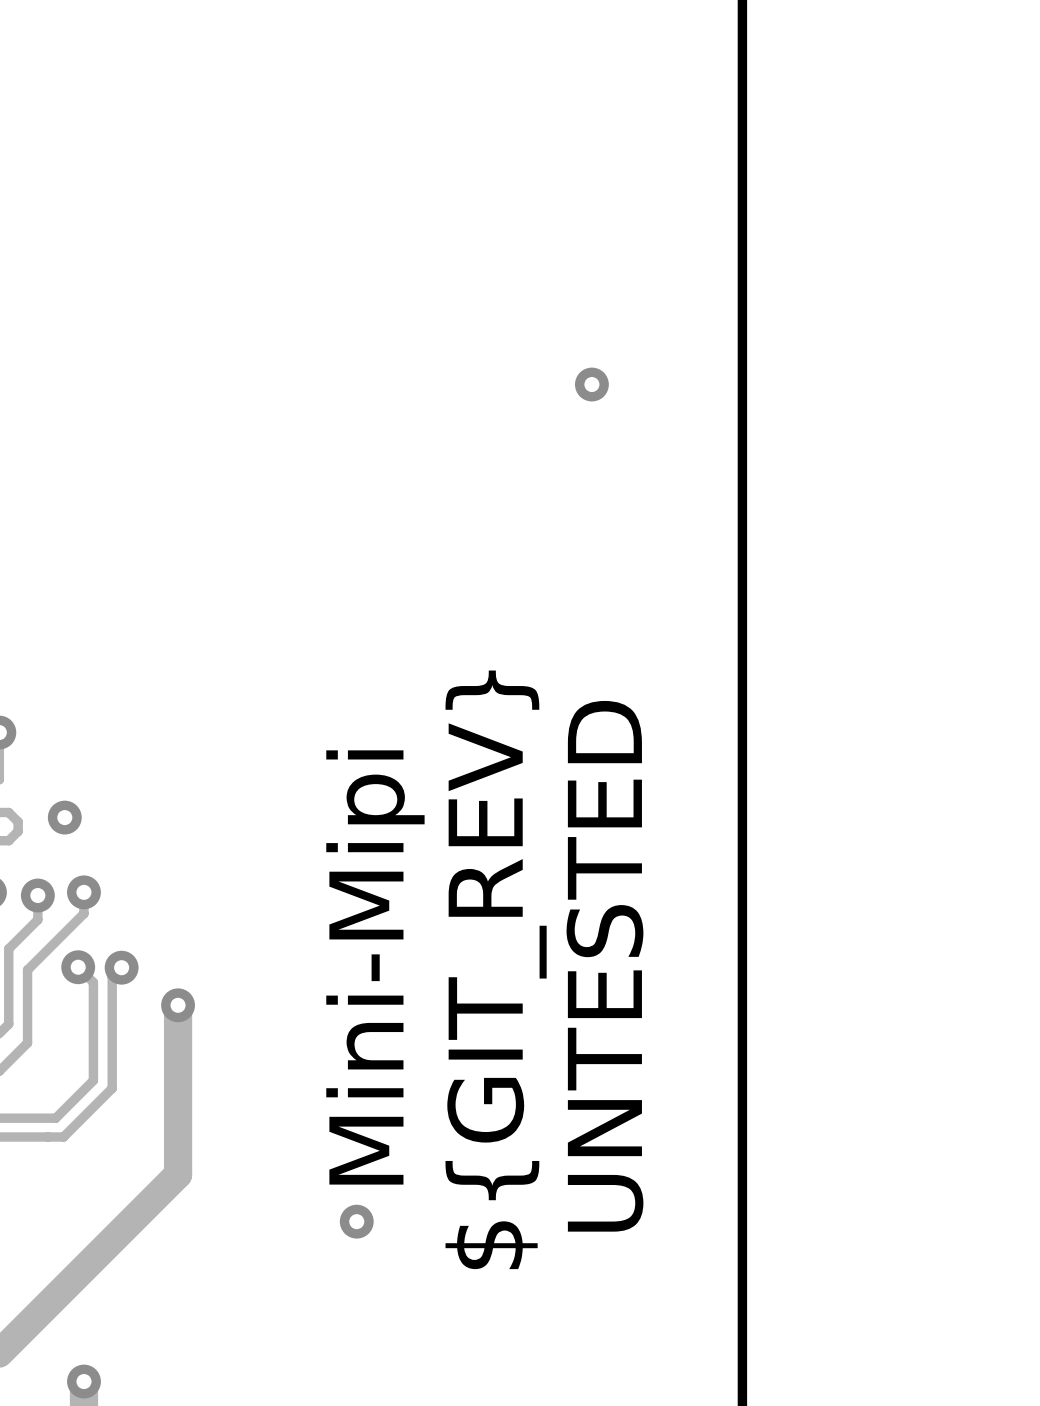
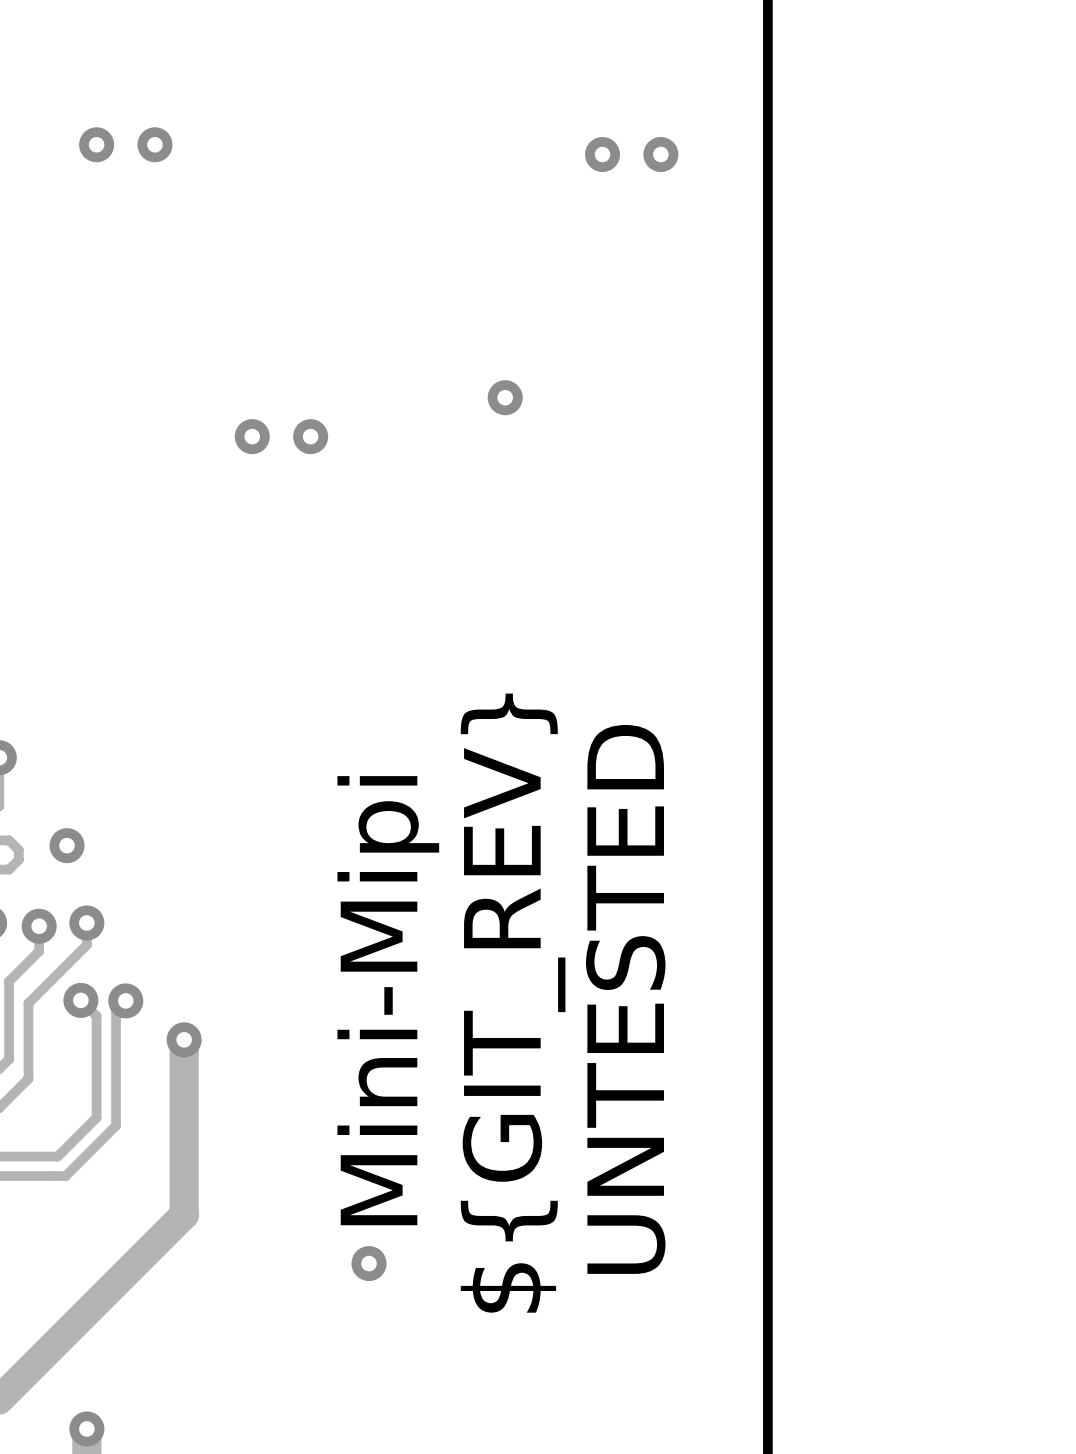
via: none -> (96, 144)
via: none -> (154, 144)
via: none -> (602, 154)
via: none -> (660, 154)
via position: (591, 384) -> (505, 397)
via: none -> (252, 436)
via: none -> (310, 436)

